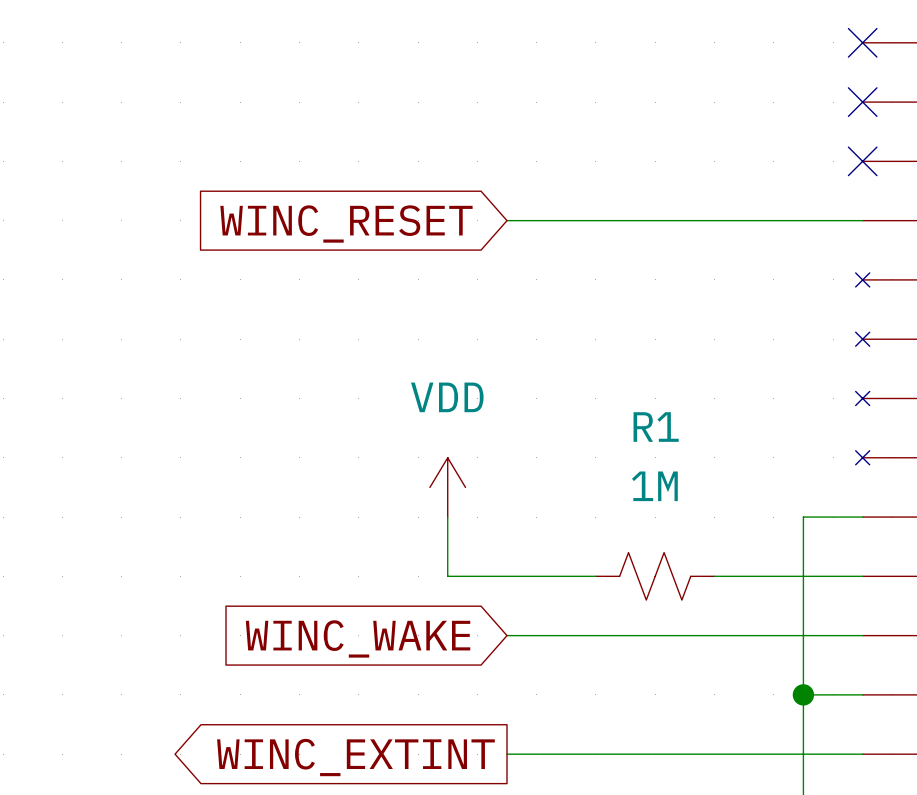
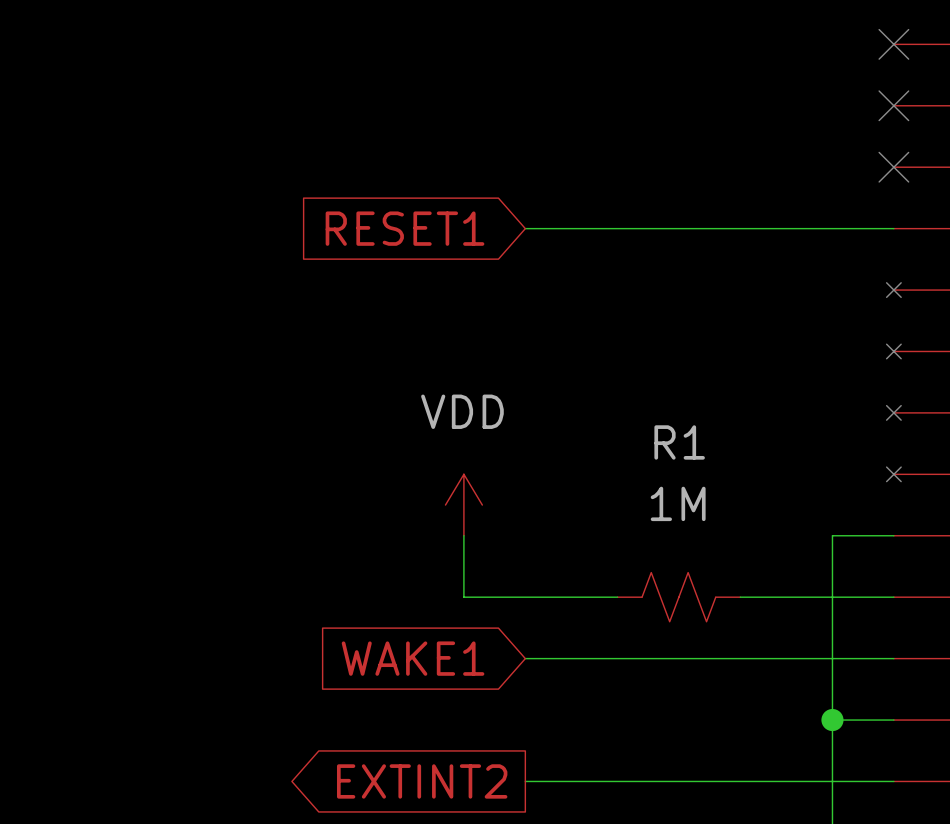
global label: WINC_RESET (346, 223) -> RESET1 (405, 228)
global label: WINC_WAKE (358, 638) -> WAKE1 (413, 658)
global label: WINC_EXTINT (355, 757) -> EXTINT2 (422, 781)

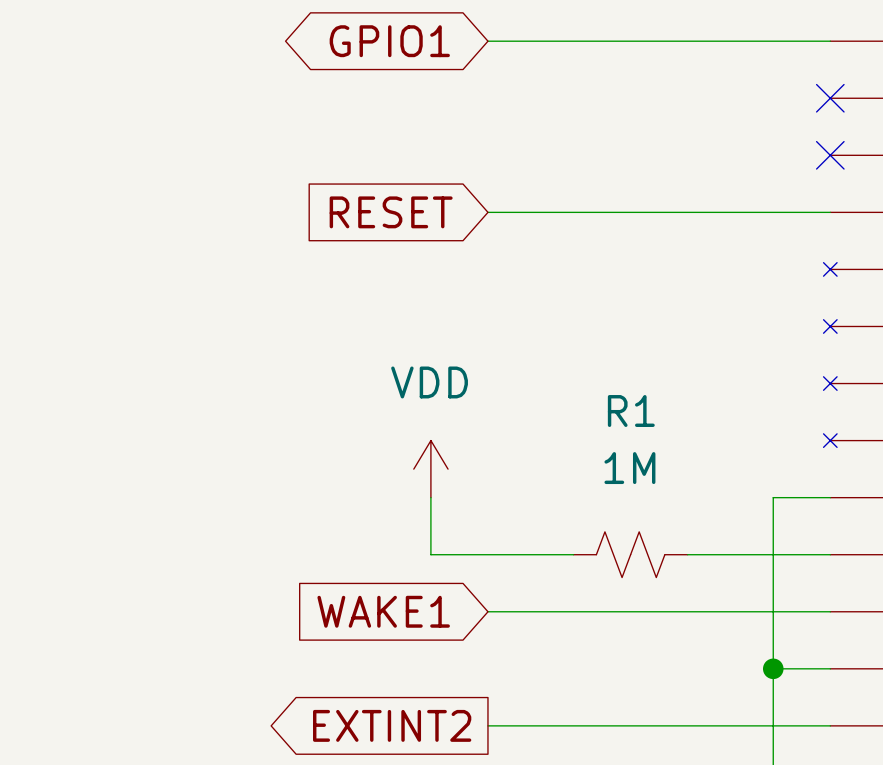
global label: none -> GPIO1 (389, 41)
wire: none -> (487, 41) (830, 41)
no-connect mark: (893, 44) -> none
global label: RESET1 (405, 228) -> RESET (391, 212)

